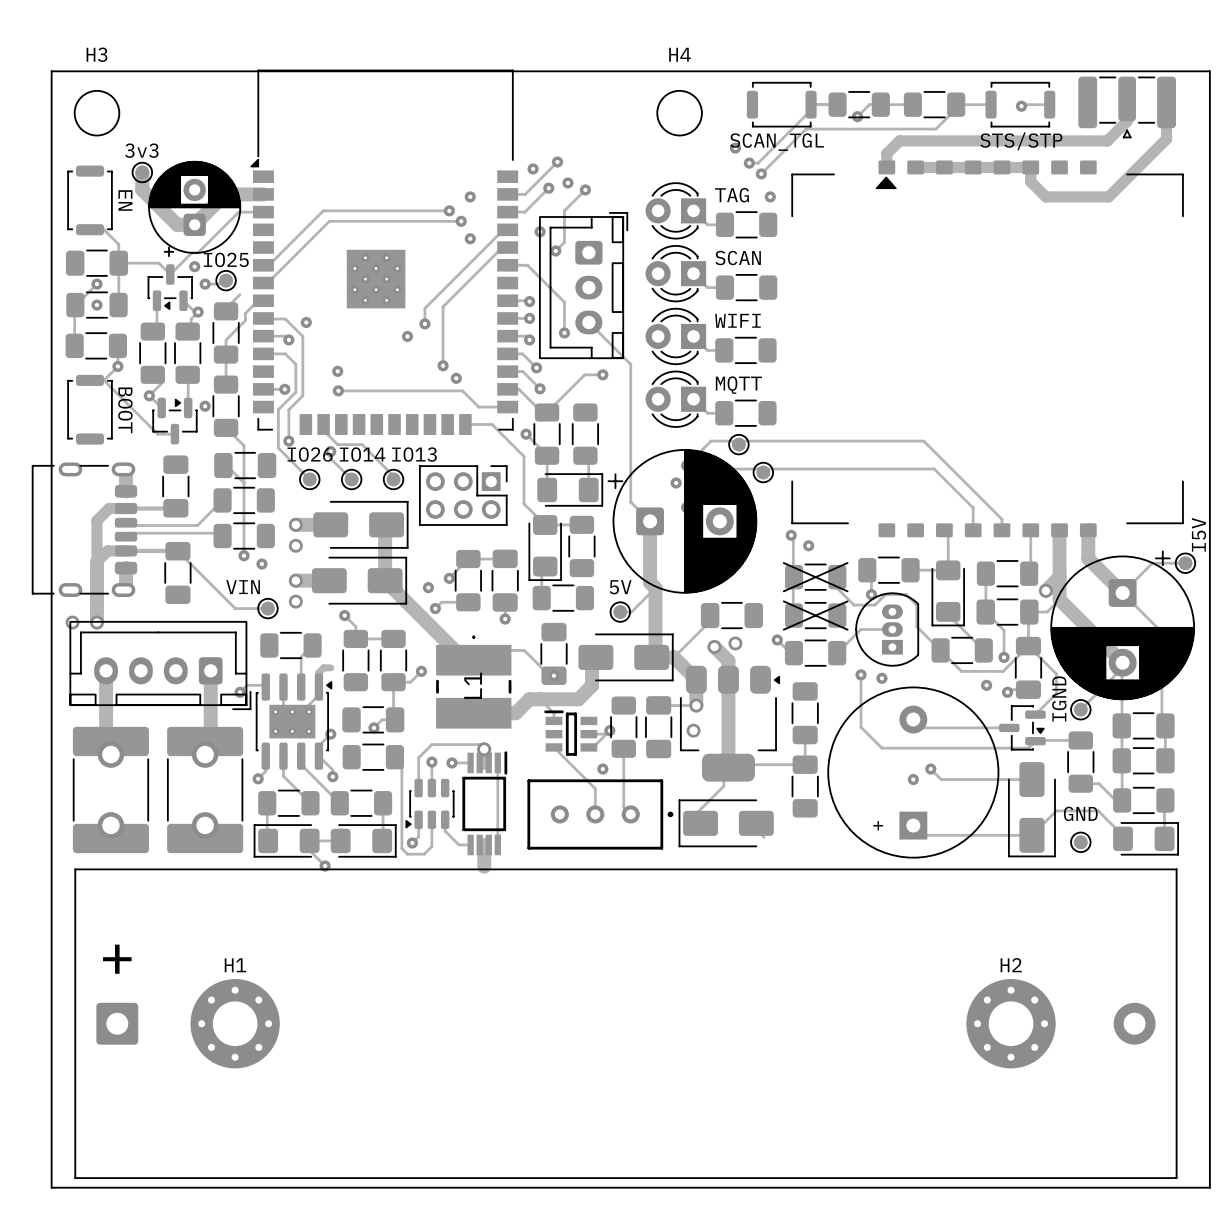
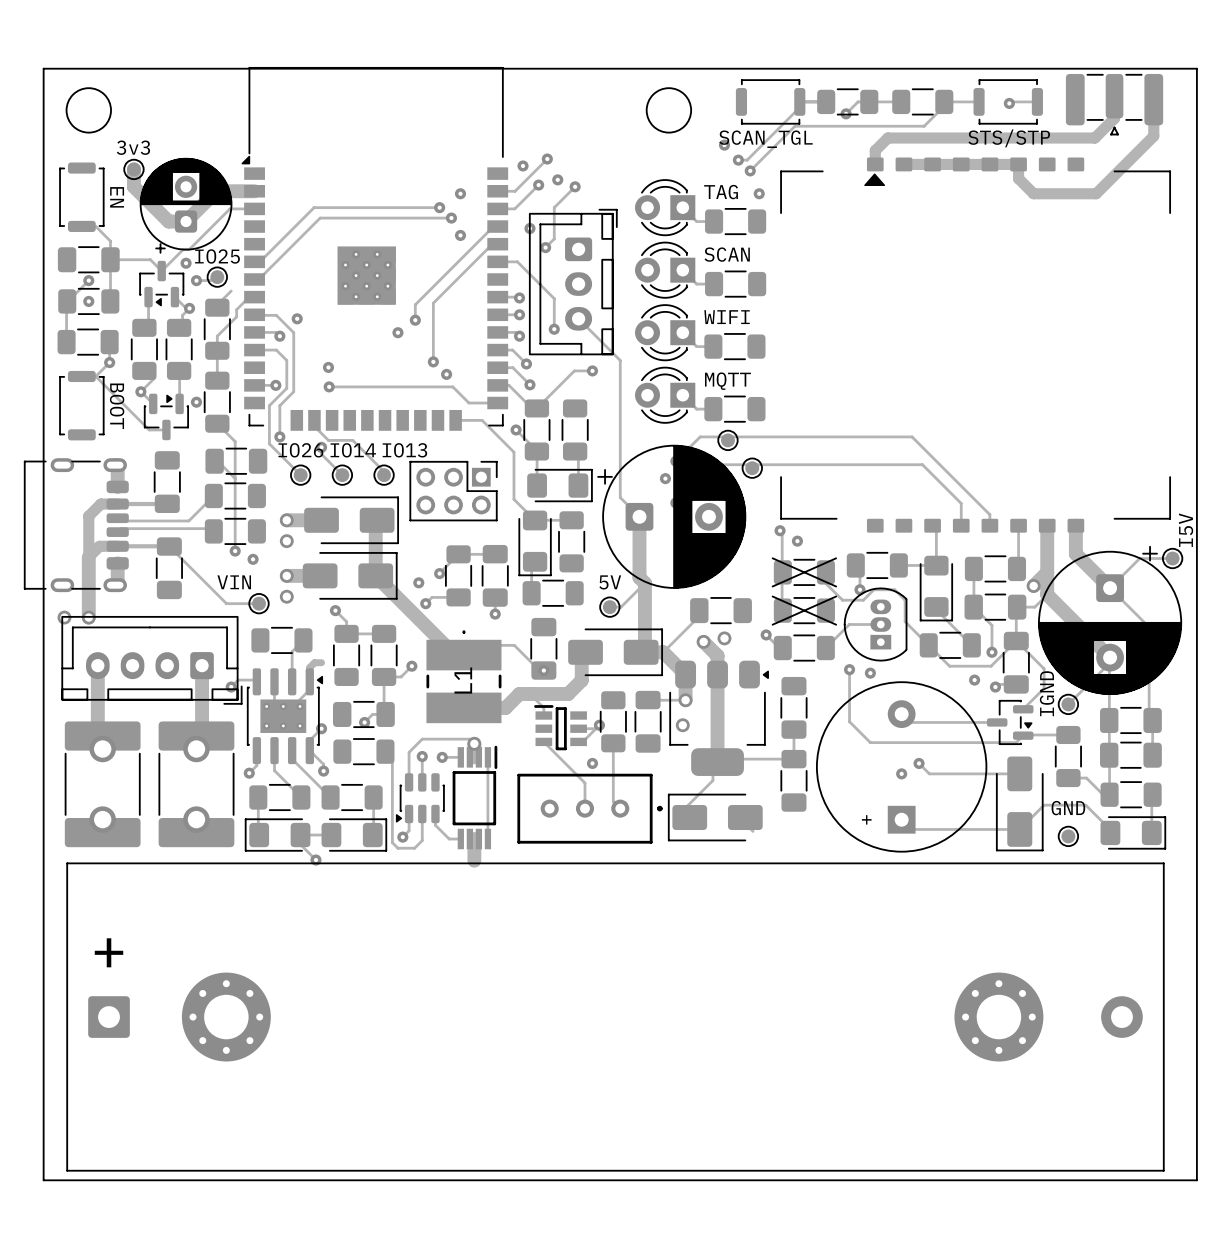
H3 name: H3 (96, 54) -> none
H4 name: H4 (680, 54) -> none
H1 name: H1 (235, 965) -> none
H2 name: H2 (1011, 965) -> none

